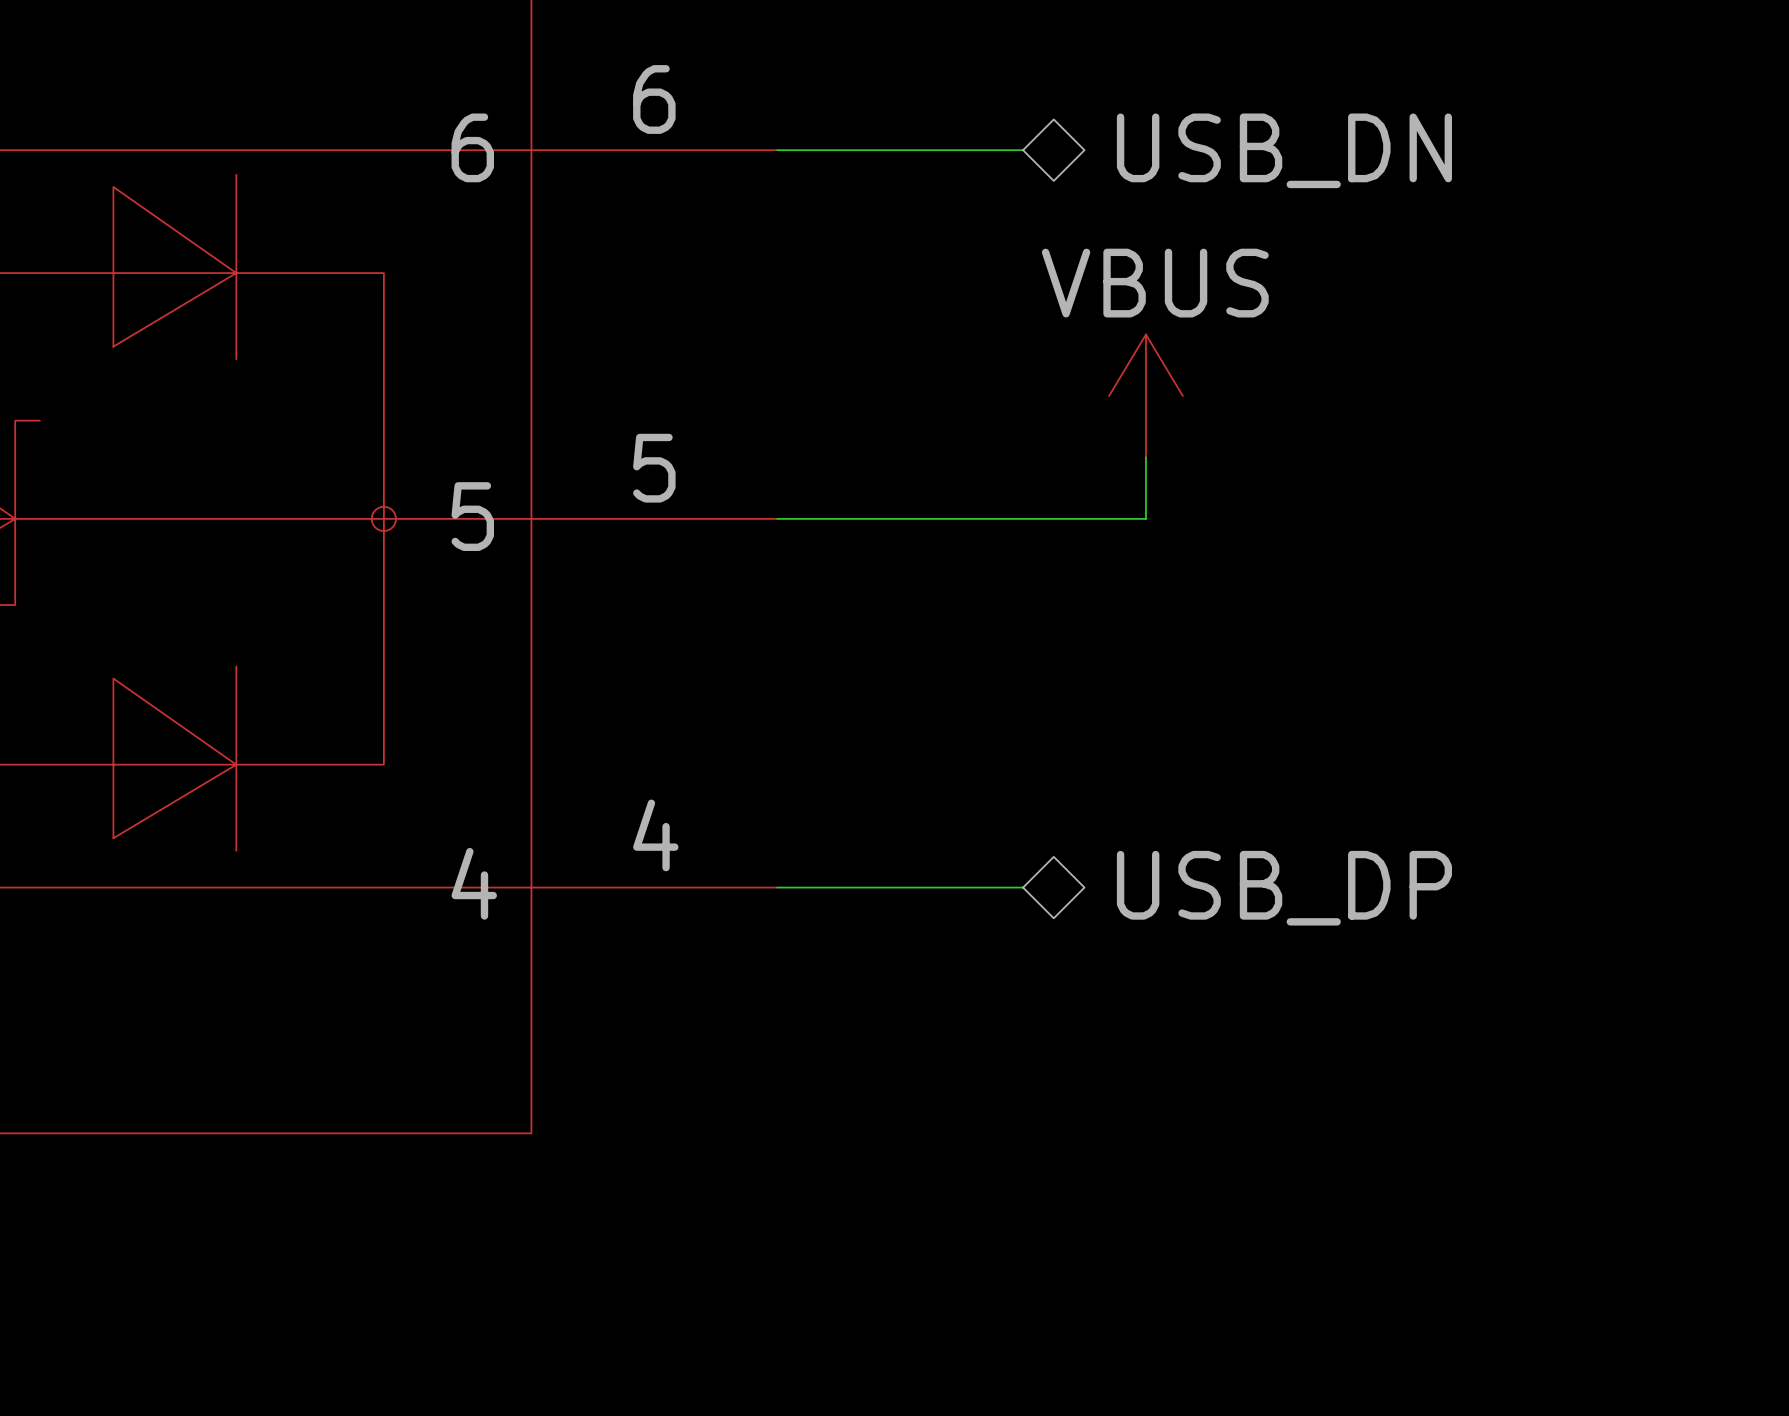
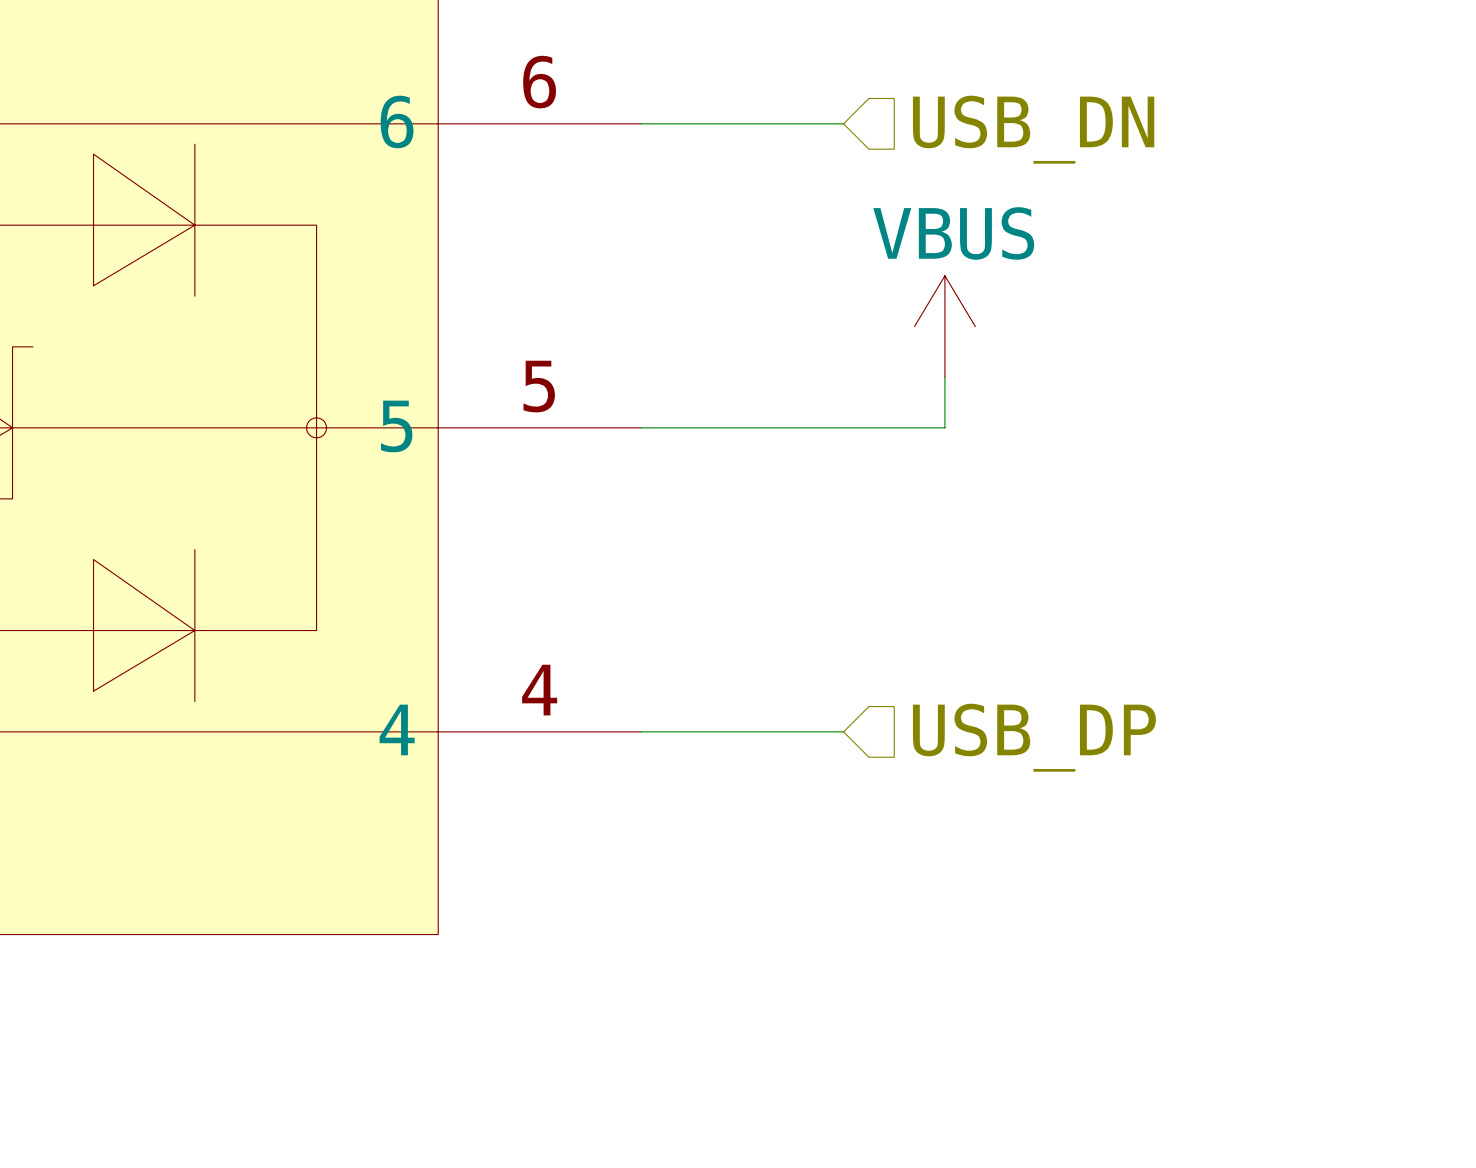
hierarchical label shape: bidirectional (1284, 150) -> input (1033, 129)
hierarchical label shape: bidirectional (1284, 888) -> input (1034, 737)

